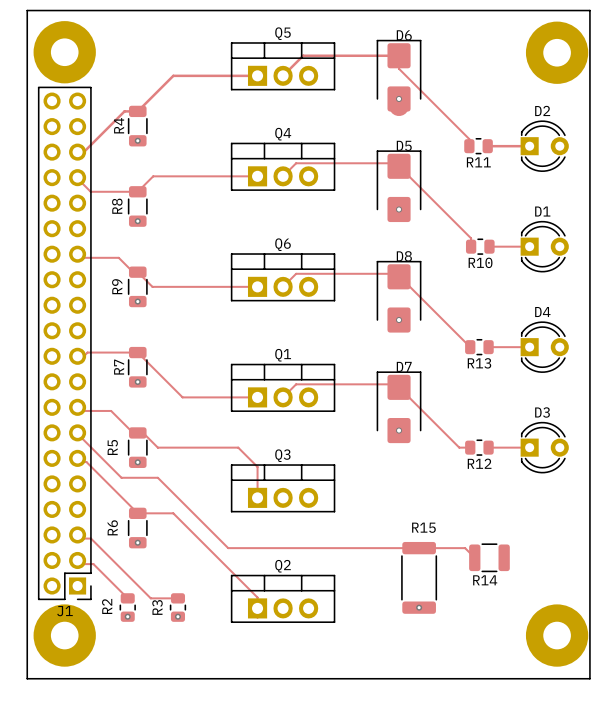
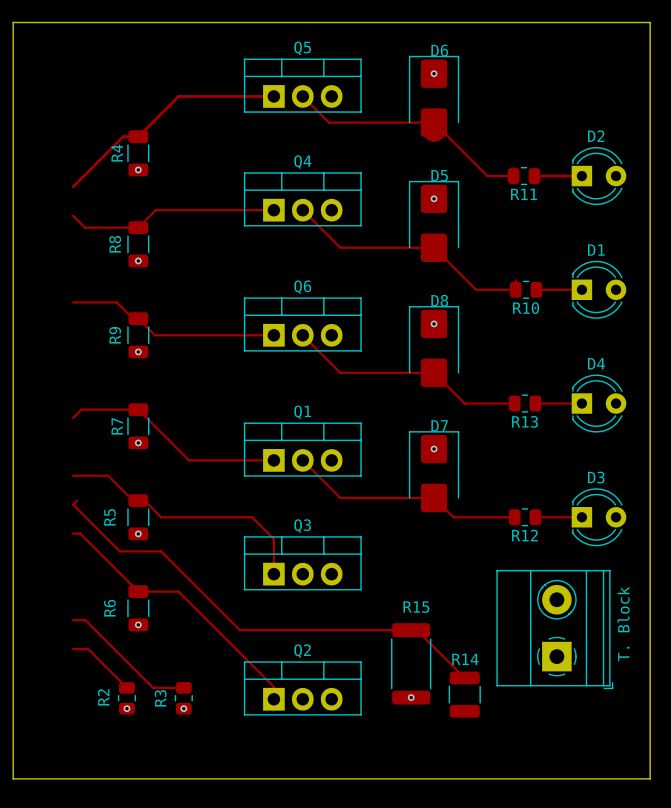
via: none -> (434, 73)
top track: (283, 75) (303, 55) (399, 55) (399, 68) (469, 139) -> (302, 96) (328, 122) (434, 122) (487, 176) (513, 176)
via: (399, 98) -> none
top track: (396, 163) (296, 163) (283, 176) -> (515, 289) (476, 289) (434, 247) (340, 247) (302, 210)
top track: (399, 166) (471, 238) -> none
via: none -> (434, 198)
via: (399, 209) -> none
top track: (396, 273) (296, 273) (283, 286) -> (514, 403) (464, 403) (434, 372) (340, 372) (302, 335)
top track: (399, 276) (470, 347) -> none
via: none -> (434, 323)
via: (399, 320) -> none
J1: (310, 343) -> none
top track: (396, 384) (296, 384) (283, 397) -> (502, 517) (453, 517) (434, 497) (340, 497) (302, 460)
top track: (399, 387) (459, 447) -> none
via: none -> (434, 449)
via: (399, 430) -> none
T. Block: none -> (554, 629)
top track: (227, 547) (465, 548) (474, 557) -> (239, 630) (416, 630) (464, 677)
R14 rotation: 0° (489, 557) -> 90° clockwise (464, 694)
R14 position: (489, 557) -> (464, 694)
R15 position: (419, 577) -> (411, 663)
R14 name position: R14 (485, 580) -> R14 (465, 659)
via position: (419, 607) -> (411, 697)

